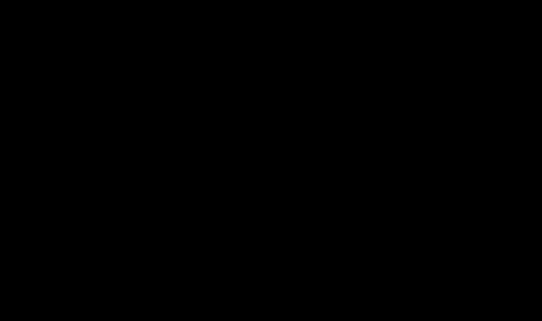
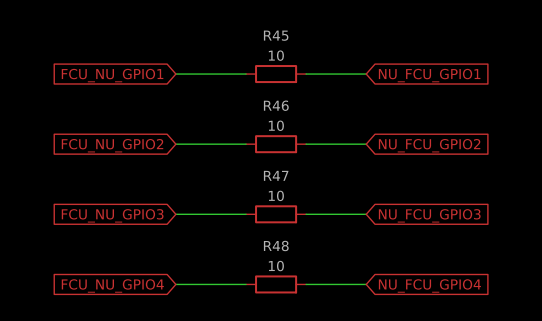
wire: none -> (175, 74) (246, 74)
R45: none -> 10 (276, 74)
wire: none -> (306, 74) (366, 74)
global label: none -> FCU_NU_GPIO1 (112, 75)
global label: none -> NU_FCU_GPIO1 (429, 75)
wire: none -> (175, 144) (246, 144)
R46: none -> 10 (276, 144)
wire: none -> (306, 144) (366, 144)
global label: none -> FCU_NU_GPIO2 (112, 145)
global label: none -> NU_FCU_GPIO2 (429, 145)
wire: none -> (175, 214) (246, 214)
R47: none -> 10 (276, 214)
wire: none -> (306, 214) (366, 214)
global label: none -> FCU_NU_GPIO3 (112, 215)
global label: none -> NU_FCU_GPIO3 (429, 215)
wire: none -> (175, 284) (246, 284)
R48: none -> 10 (276, 284)
wire: none -> (306, 284) (366, 284)
global label: none -> FCU_NU_GPIO4 (112, 285)
global label: none -> NU_FCU_GPIO4 (429, 285)

